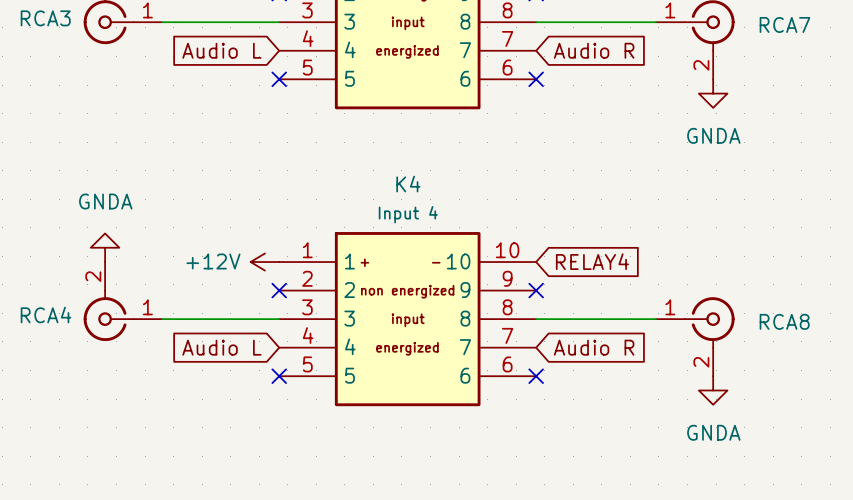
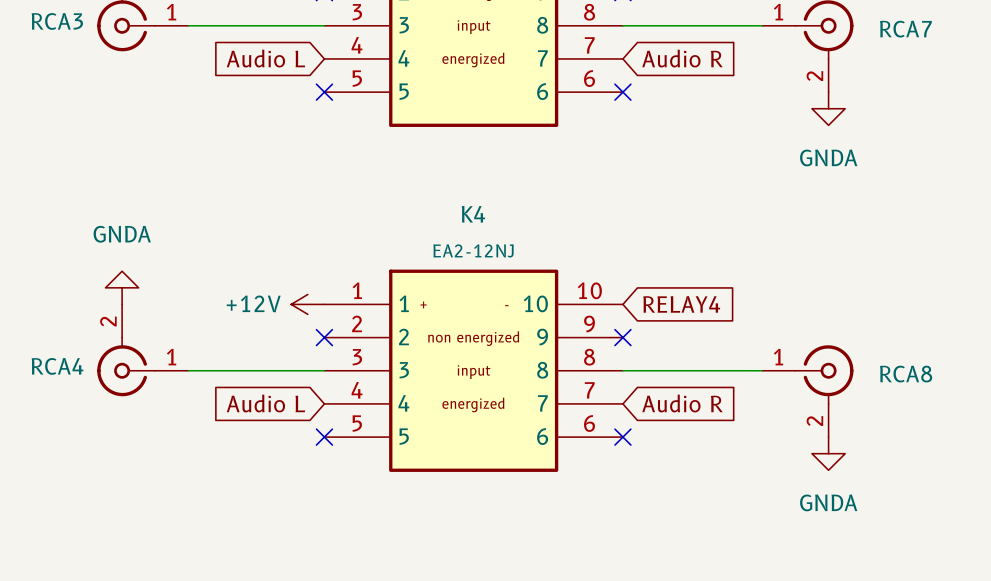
K4 value: Input 4 (408, 214) -> EA2-12NJ (473, 250)

